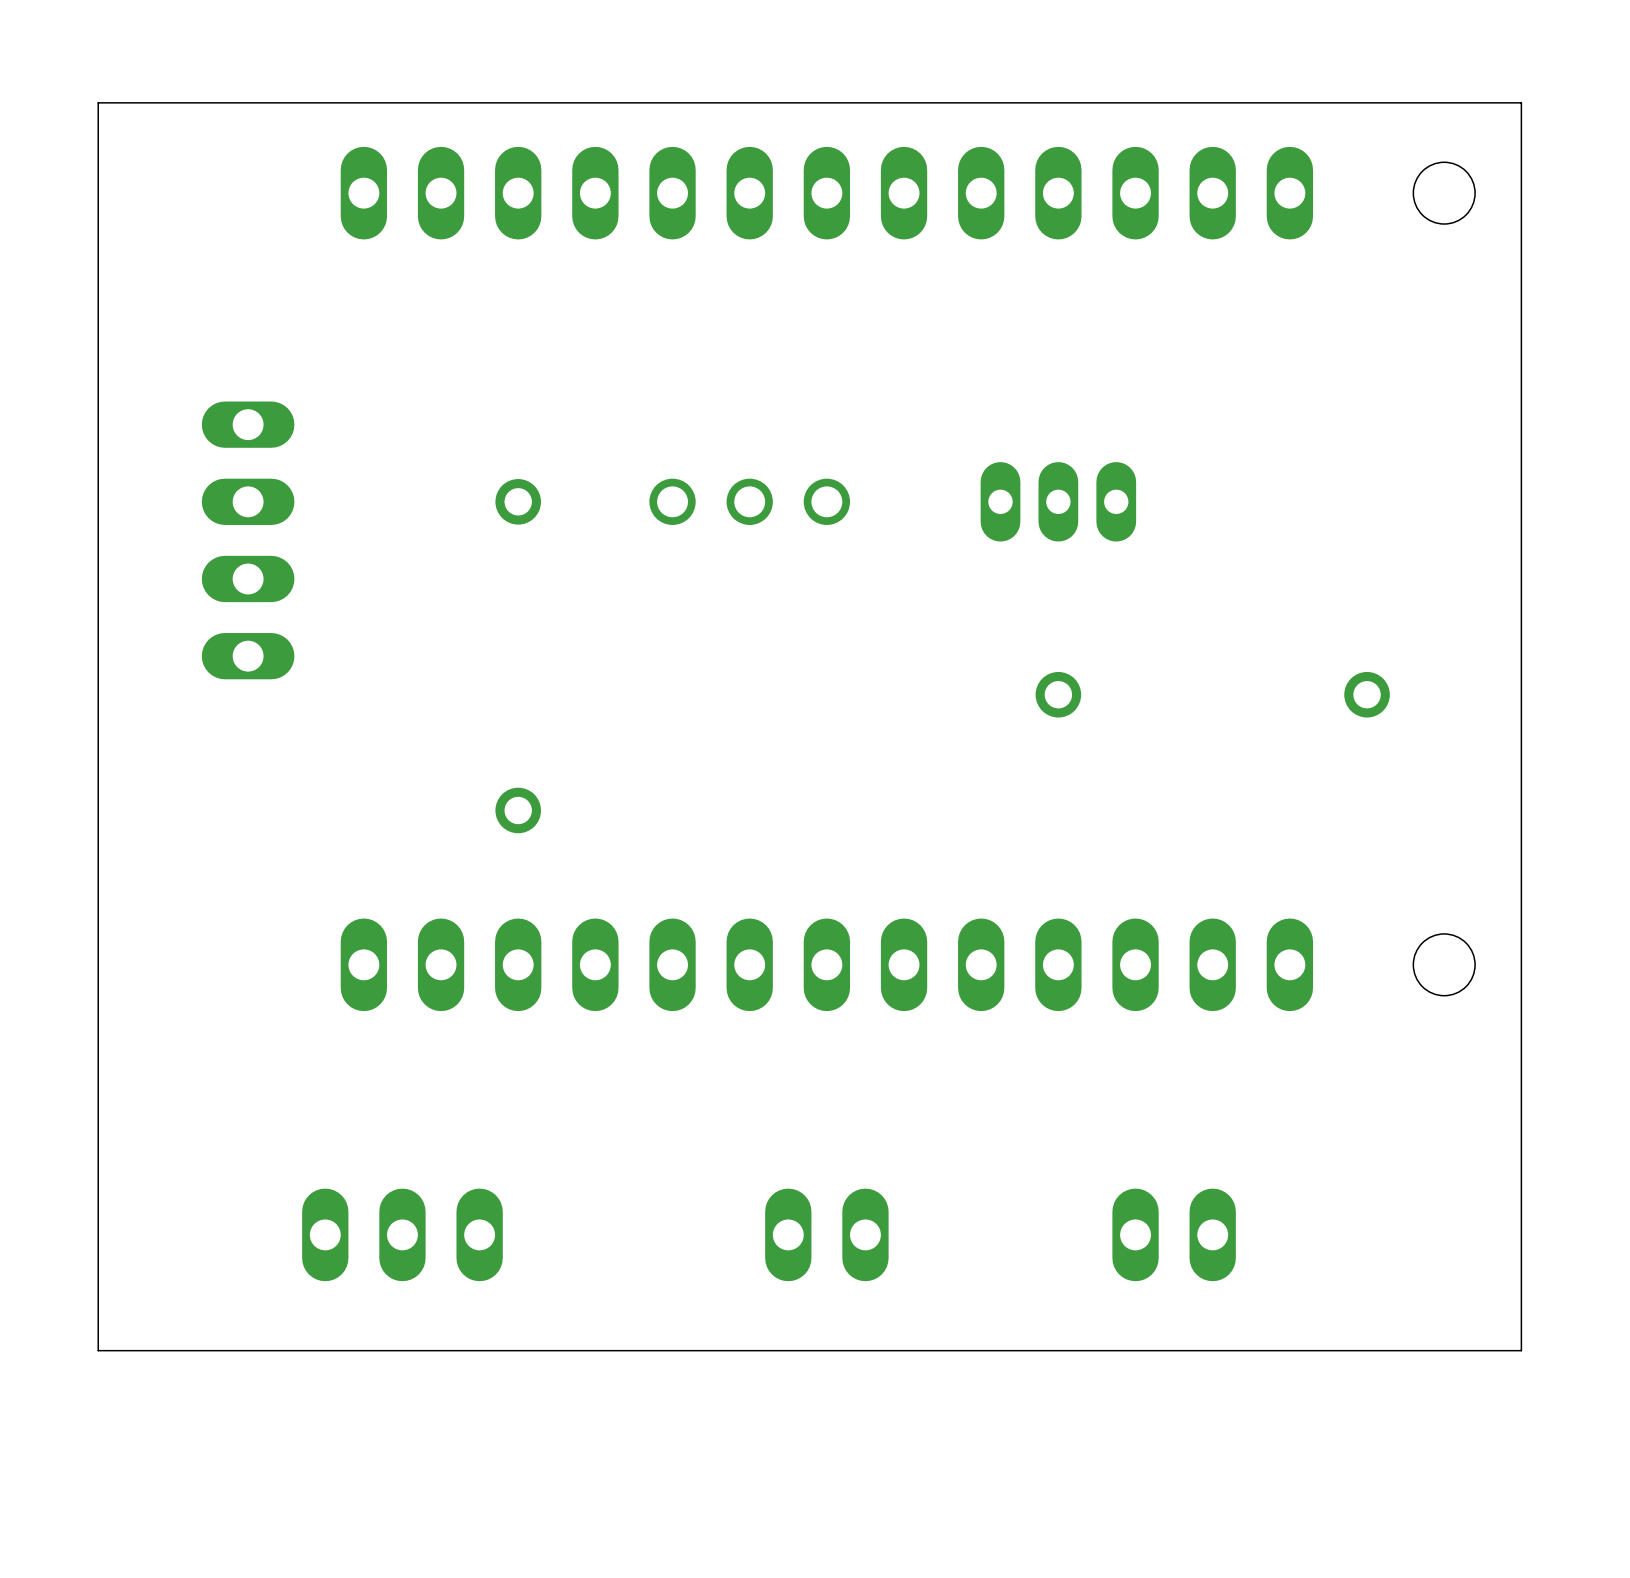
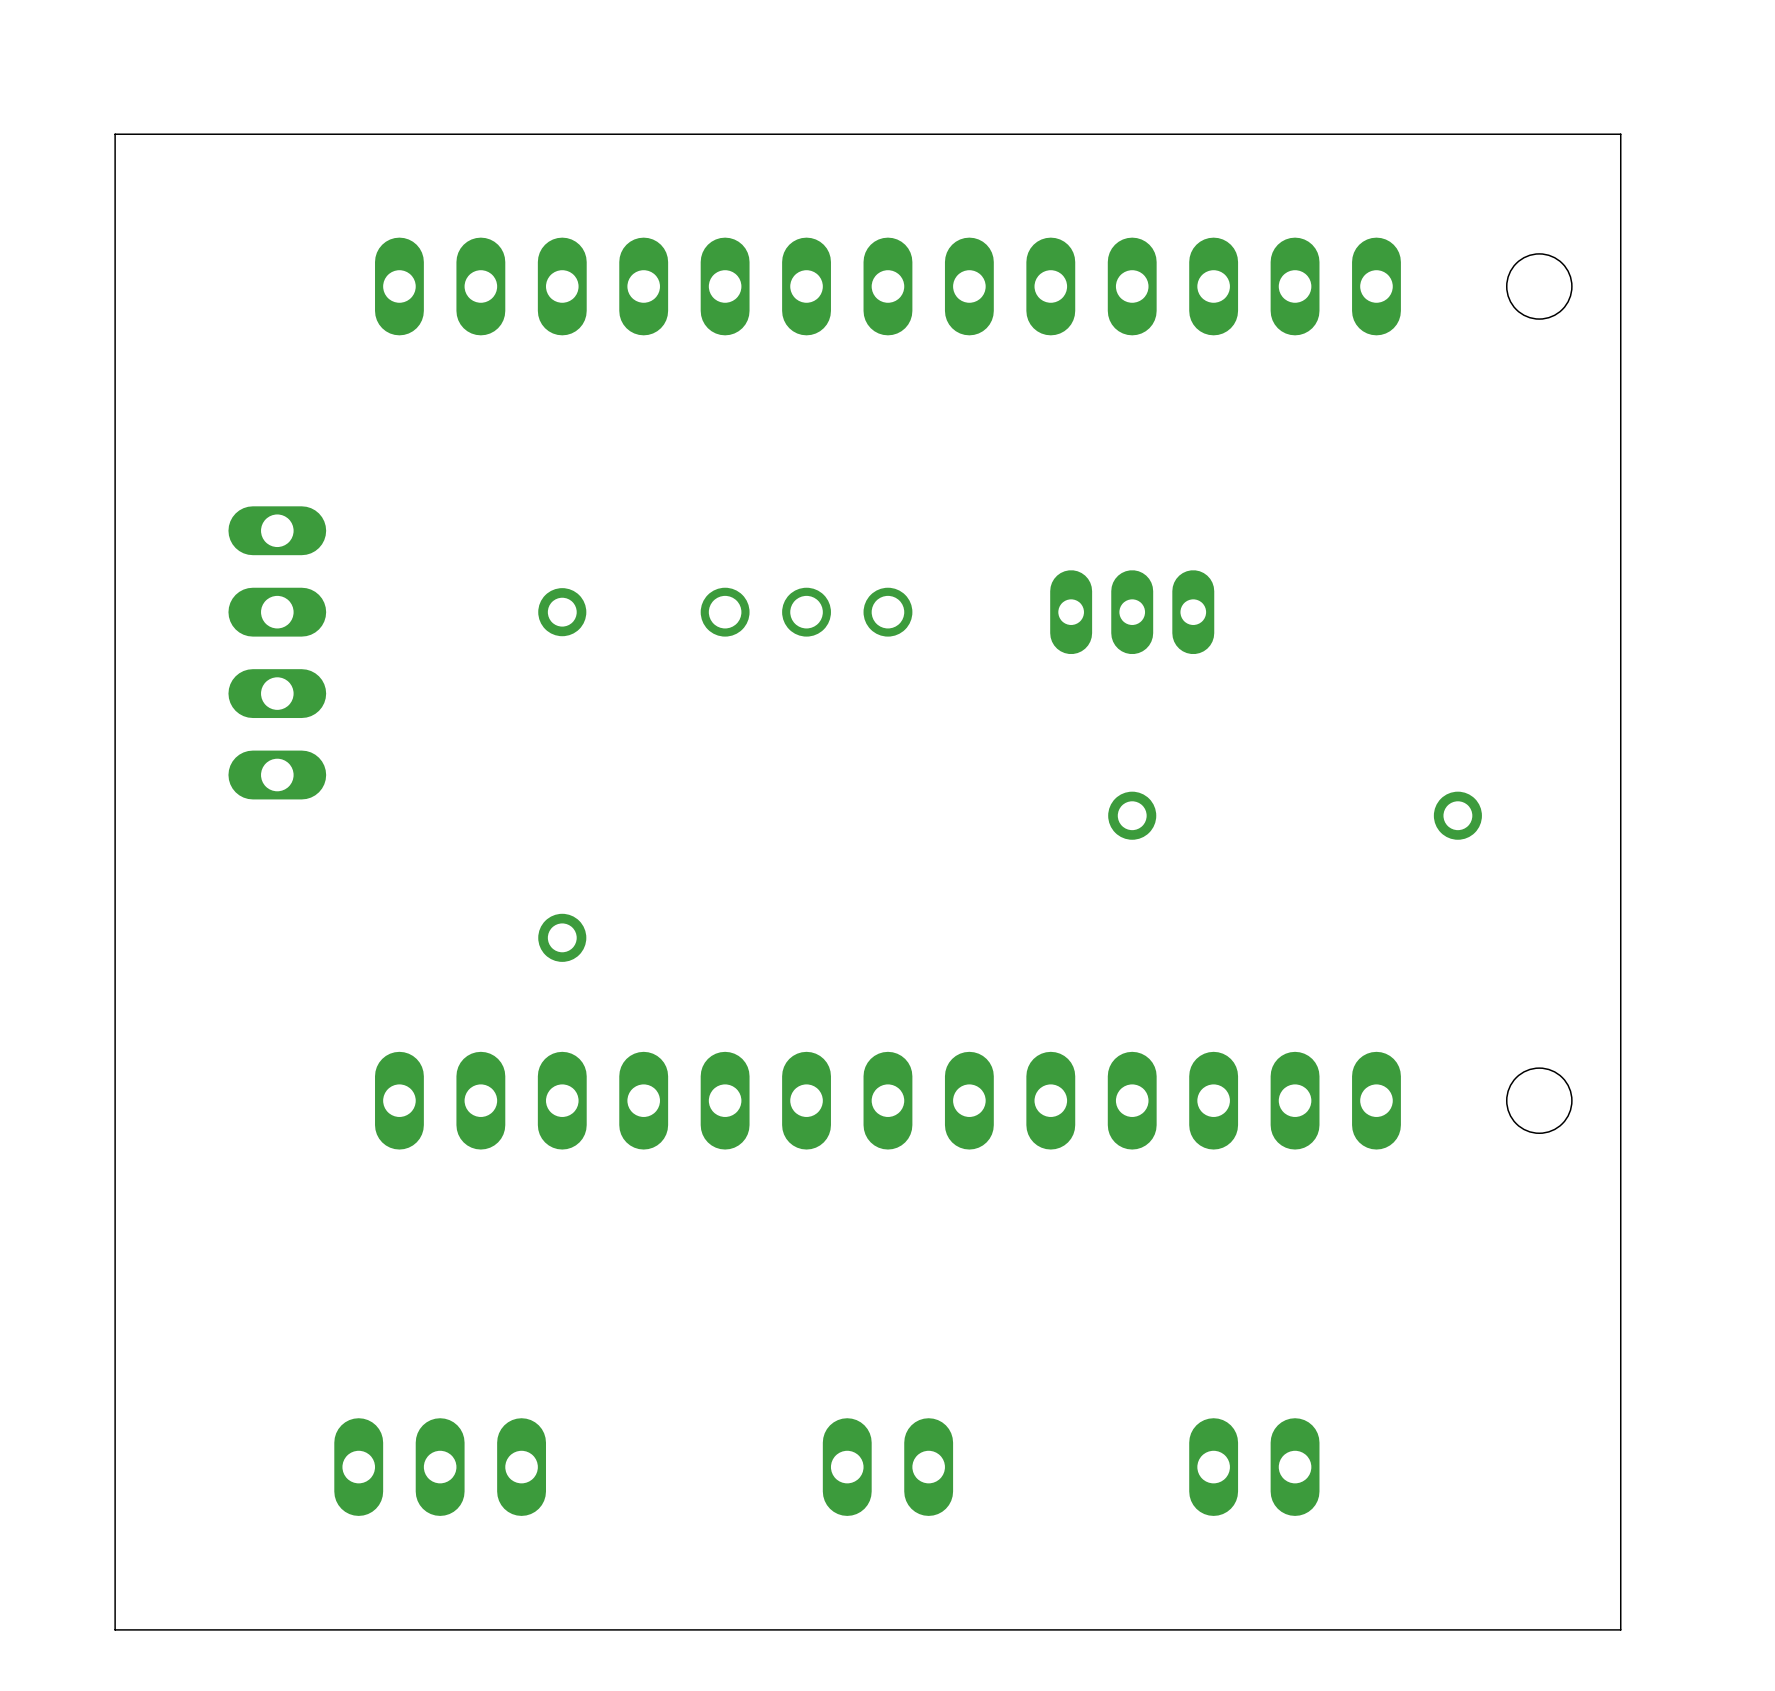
board edge: (1521, 102) (98, 102) (98, 1350) (1521, 1350) -> (1620, 191) (1620, 134) (115, 134) (115, 1629) (1620, 1629) (1620, 1507)
part position: (402, 1234) -> (440, 1467)
part position: (826, 1234) -> (887, 1467)
part position: (1174, 1234) -> (1254, 1467)

